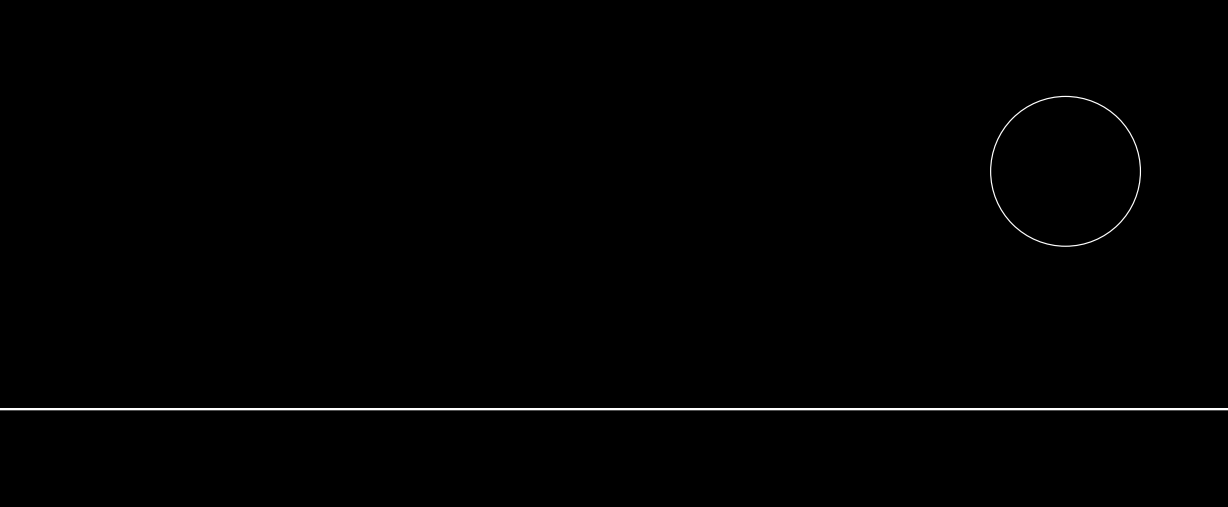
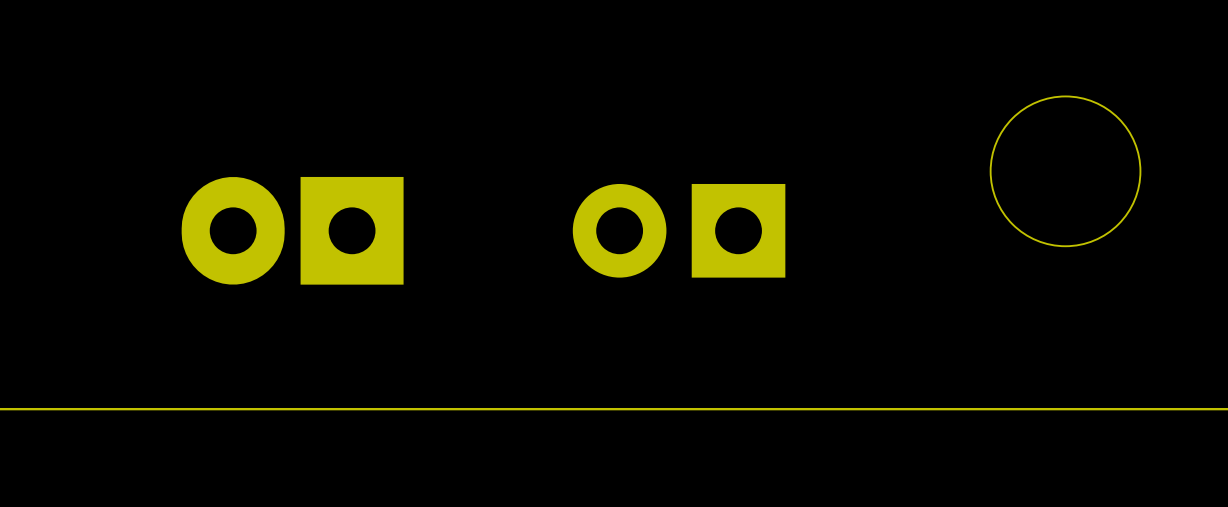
part: none -> (292, 230)
part: none -> (679, 230)

